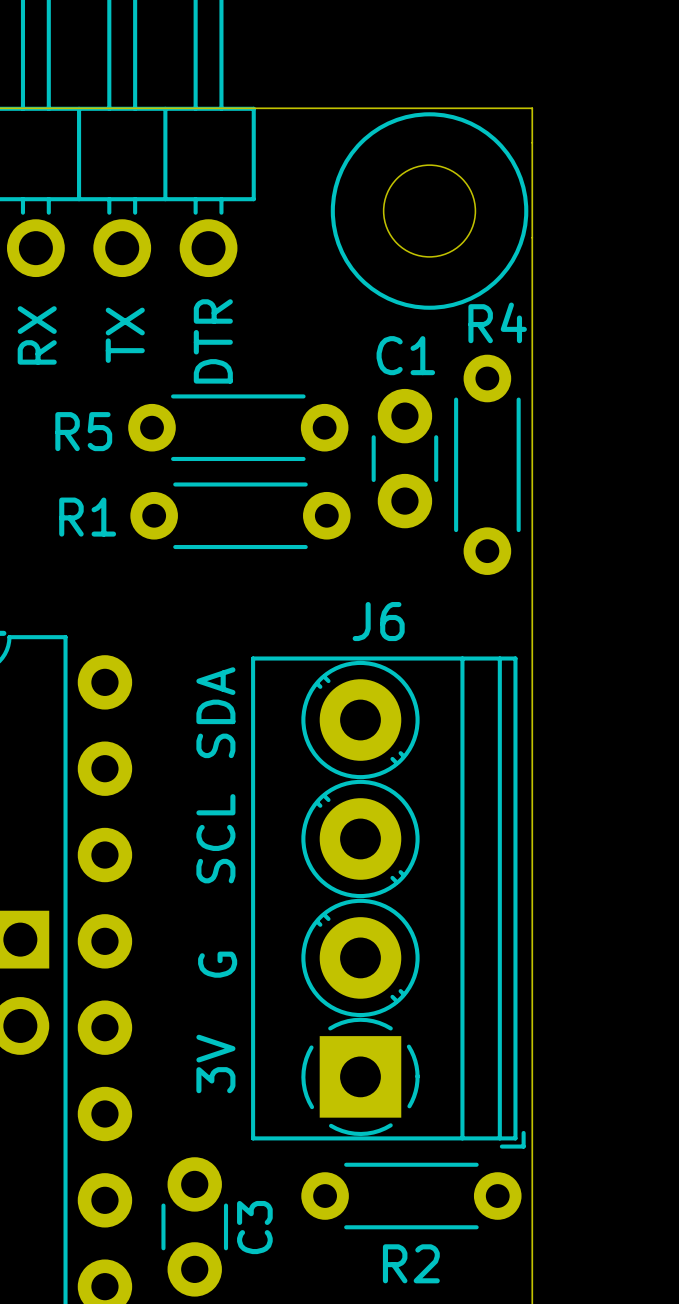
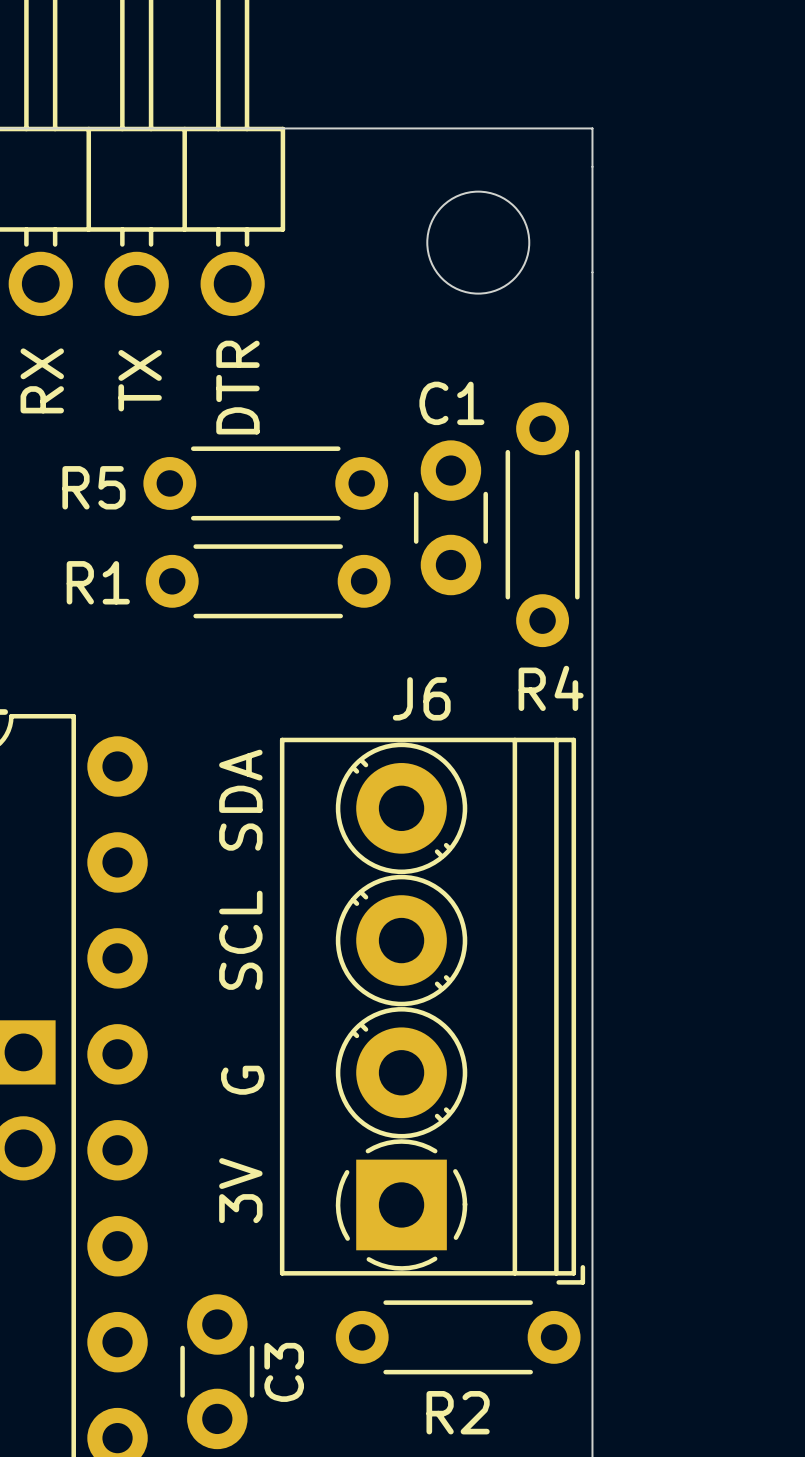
drawing: [330, 112, 529, 310] -> none
R4 name position: R4 (497, 322) -> R4 (551, 688)

